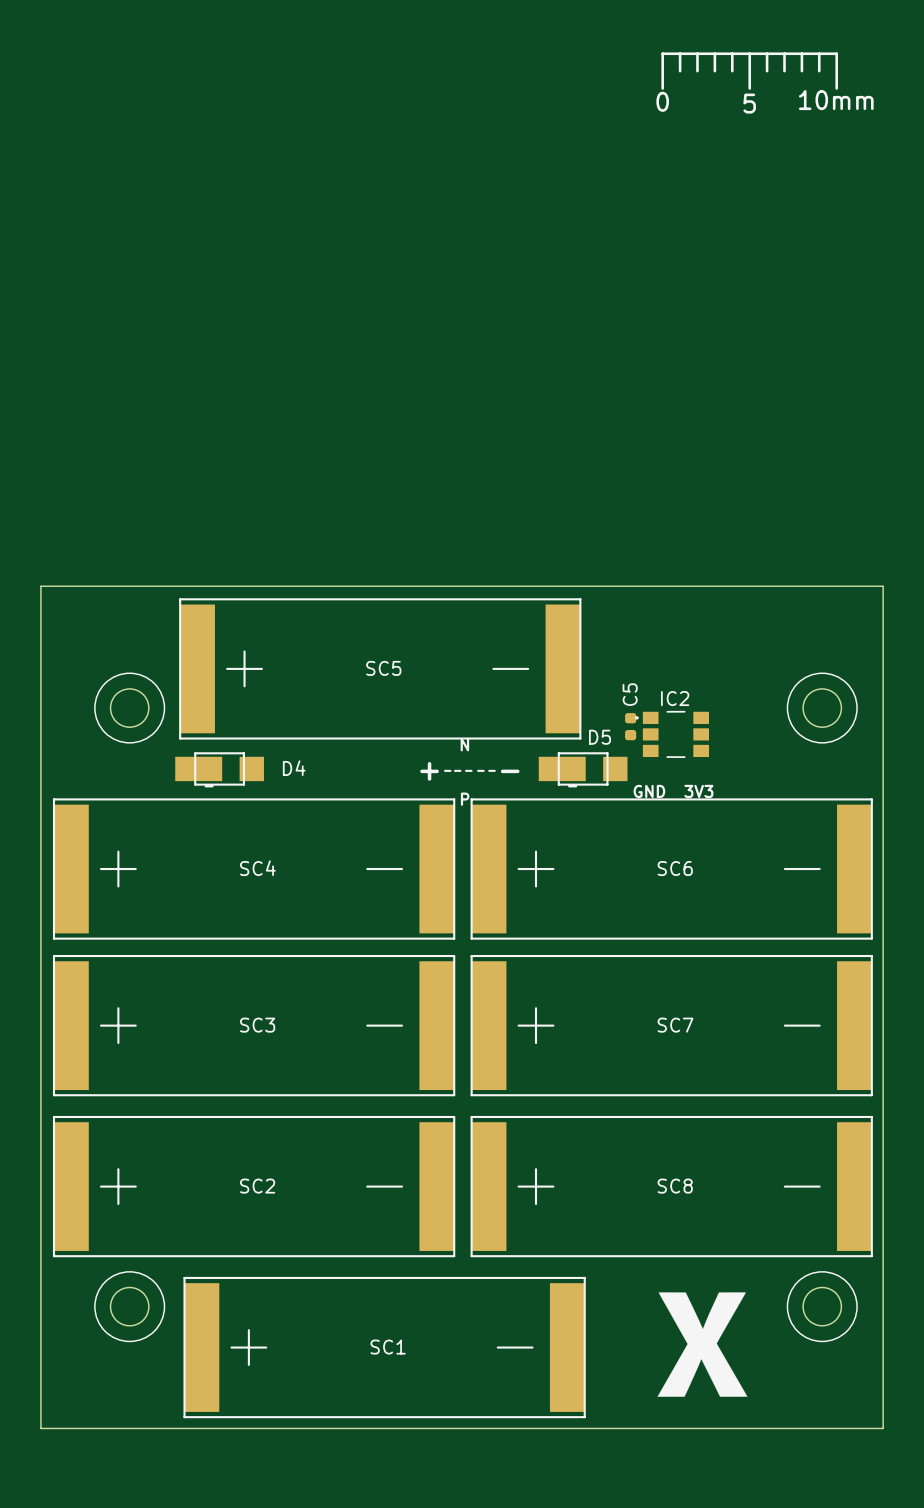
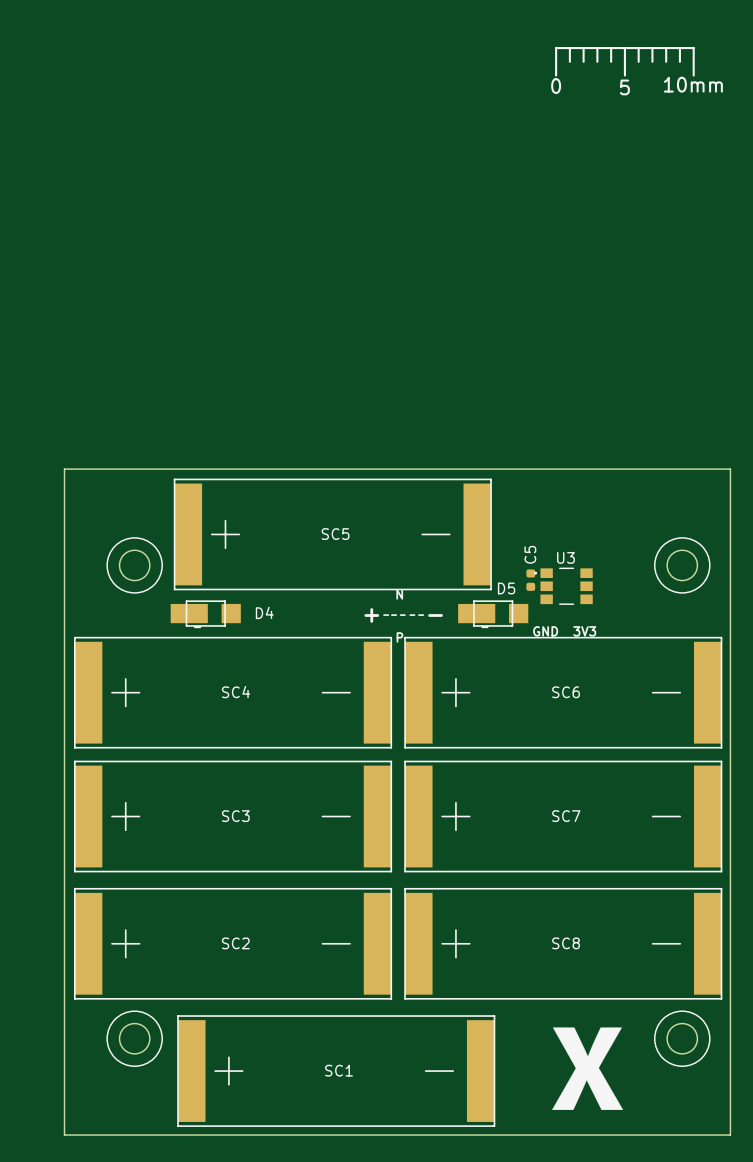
IC2 name: IC2 (675, 698) -> U3 (565, 557)

